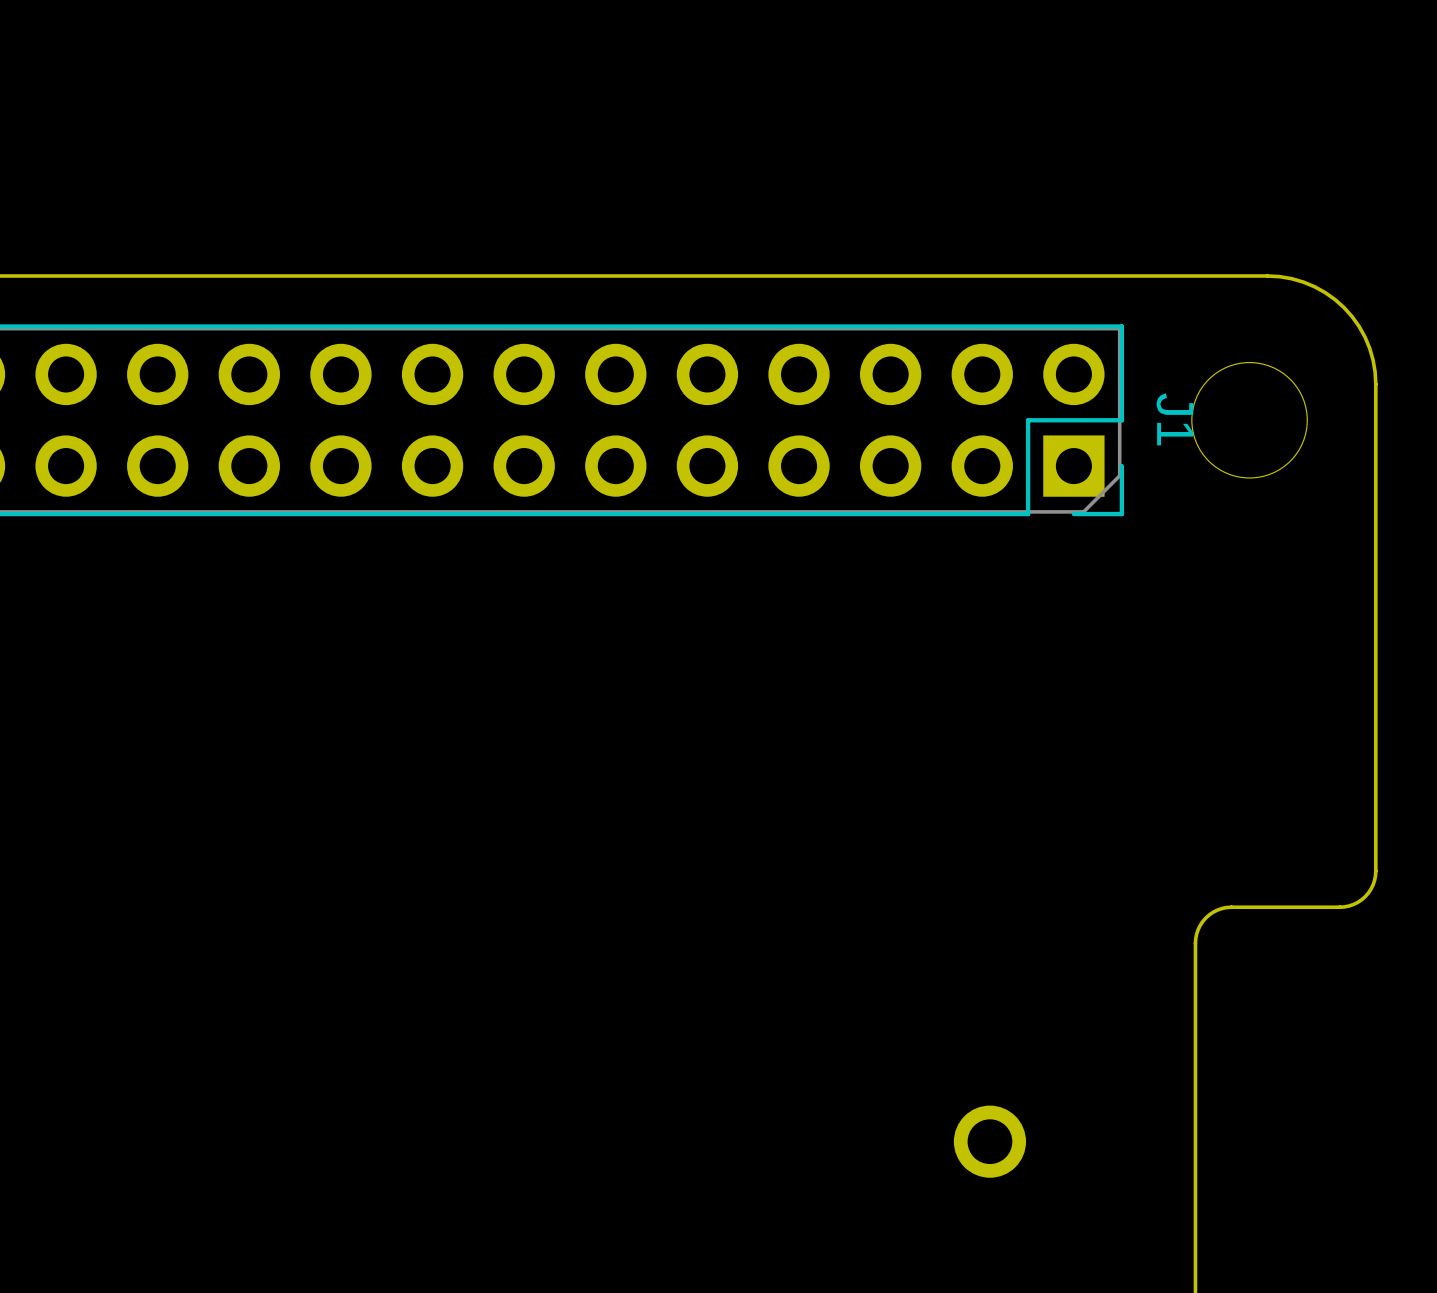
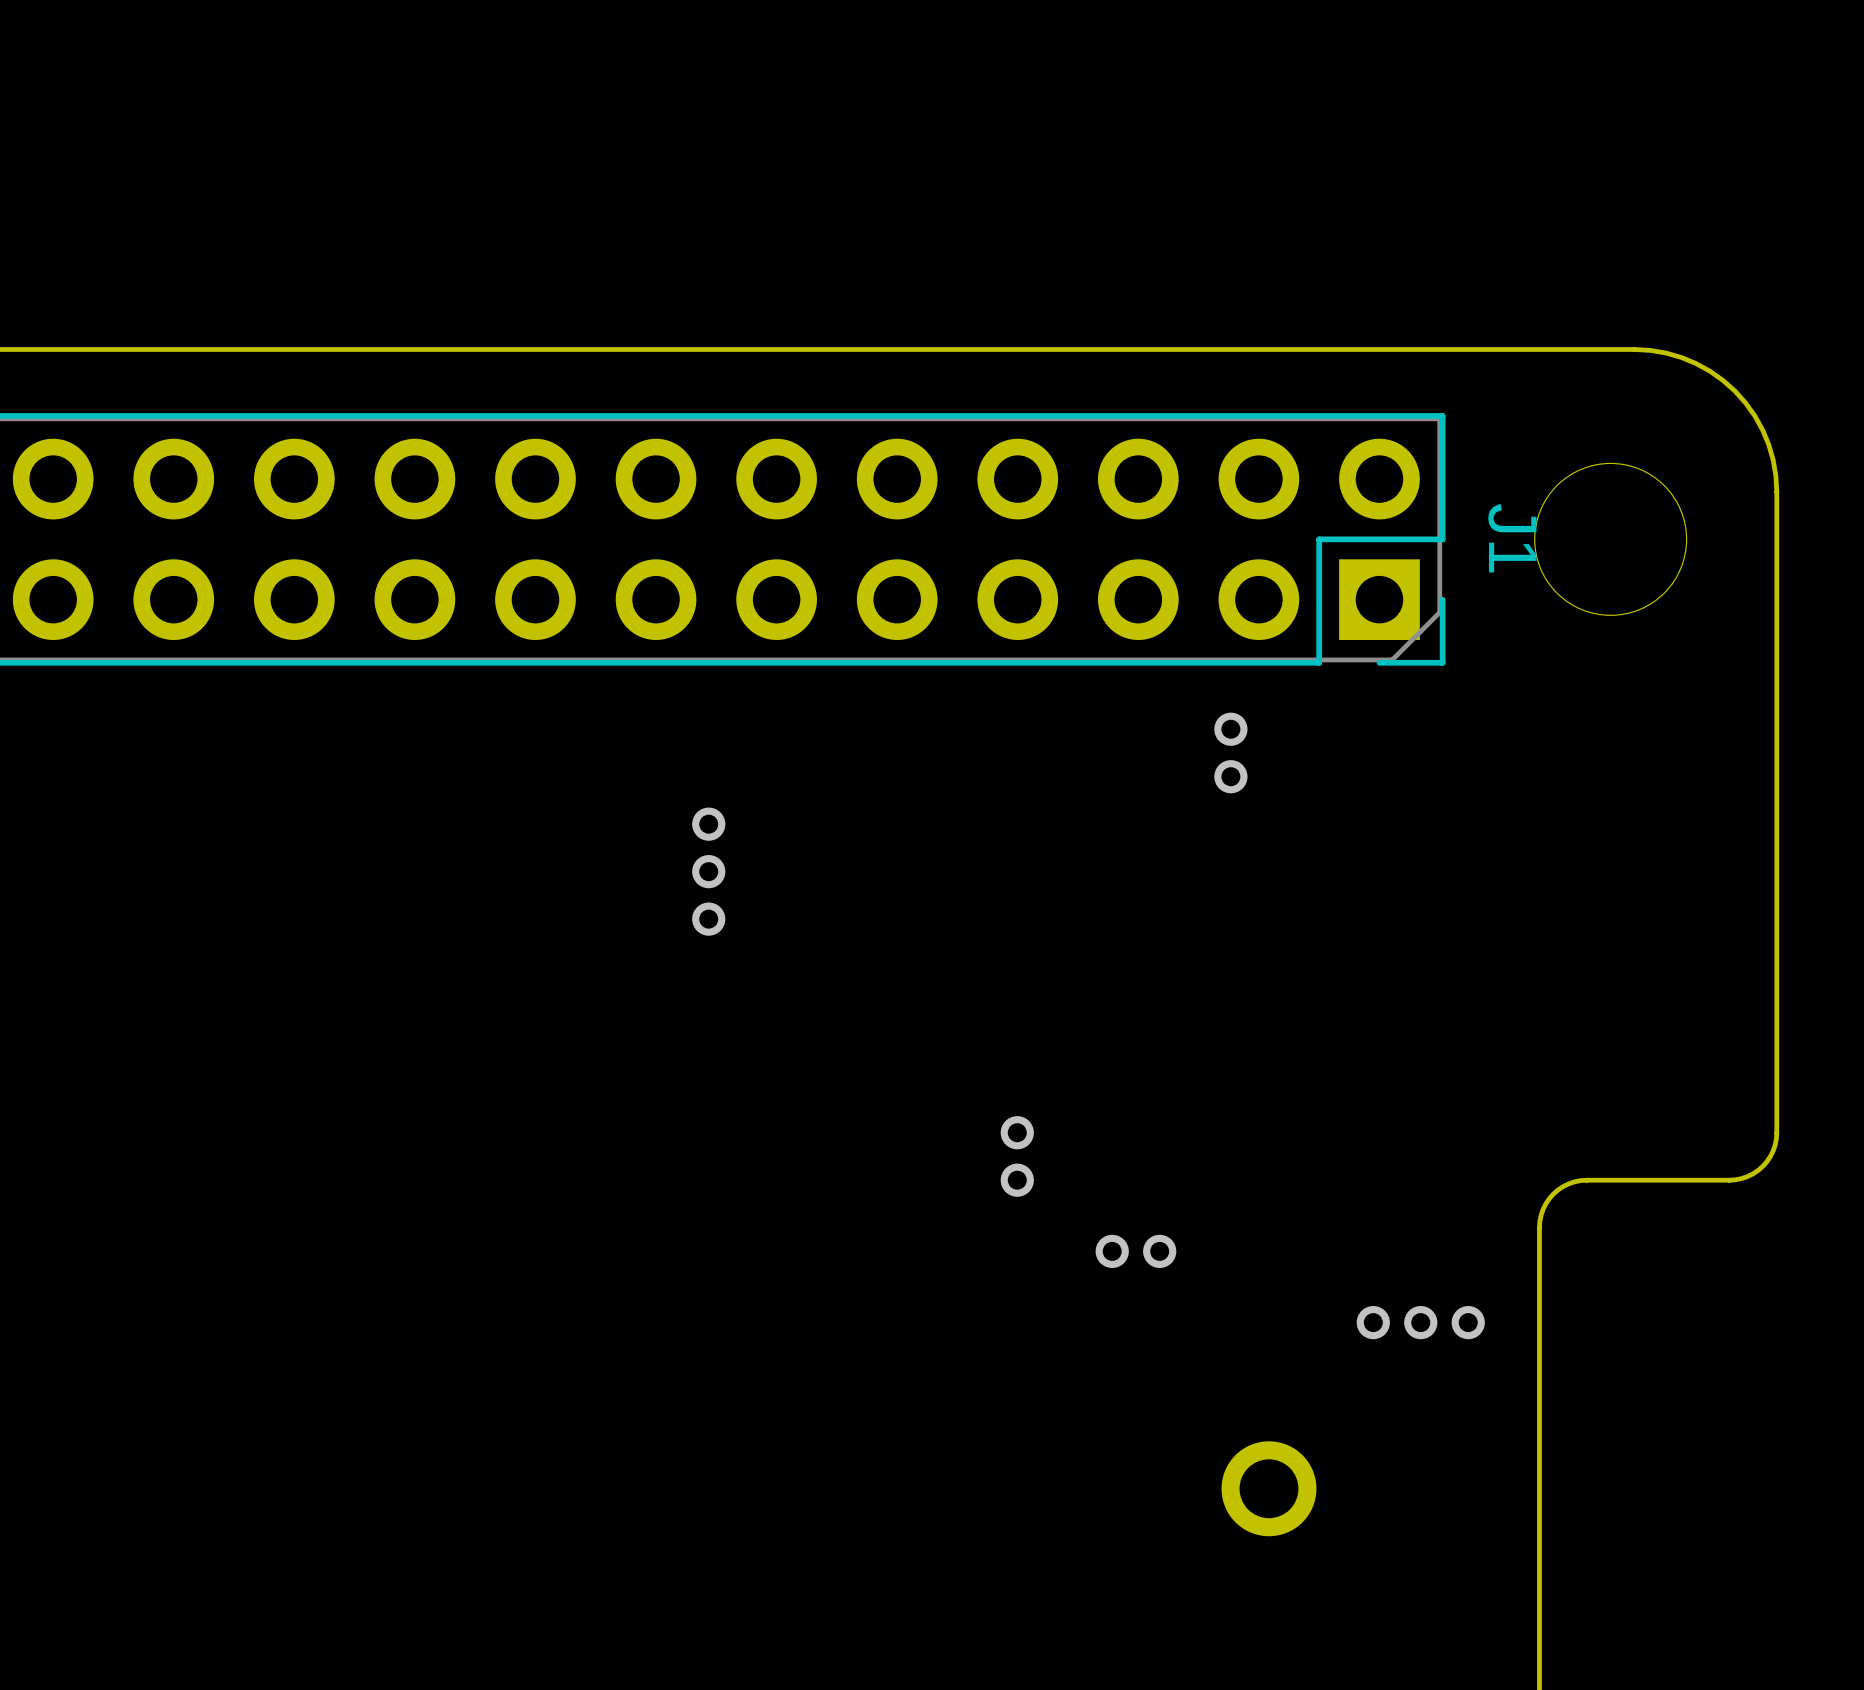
via: none -> (1230, 729)
via: none -> (1230, 776)
via: none -> (708, 824)
via: none -> (708, 871)
via: none -> (708, 919)
via: none -> (1017, 1132)
via: none -> (1017, 1180)
via: none -> (1112, 1251)
via: none -> (1159, 1251)
via: none -> (1373, 1322)
via: none -> (1420, 1322)
via: none -> (1468, 1322)

